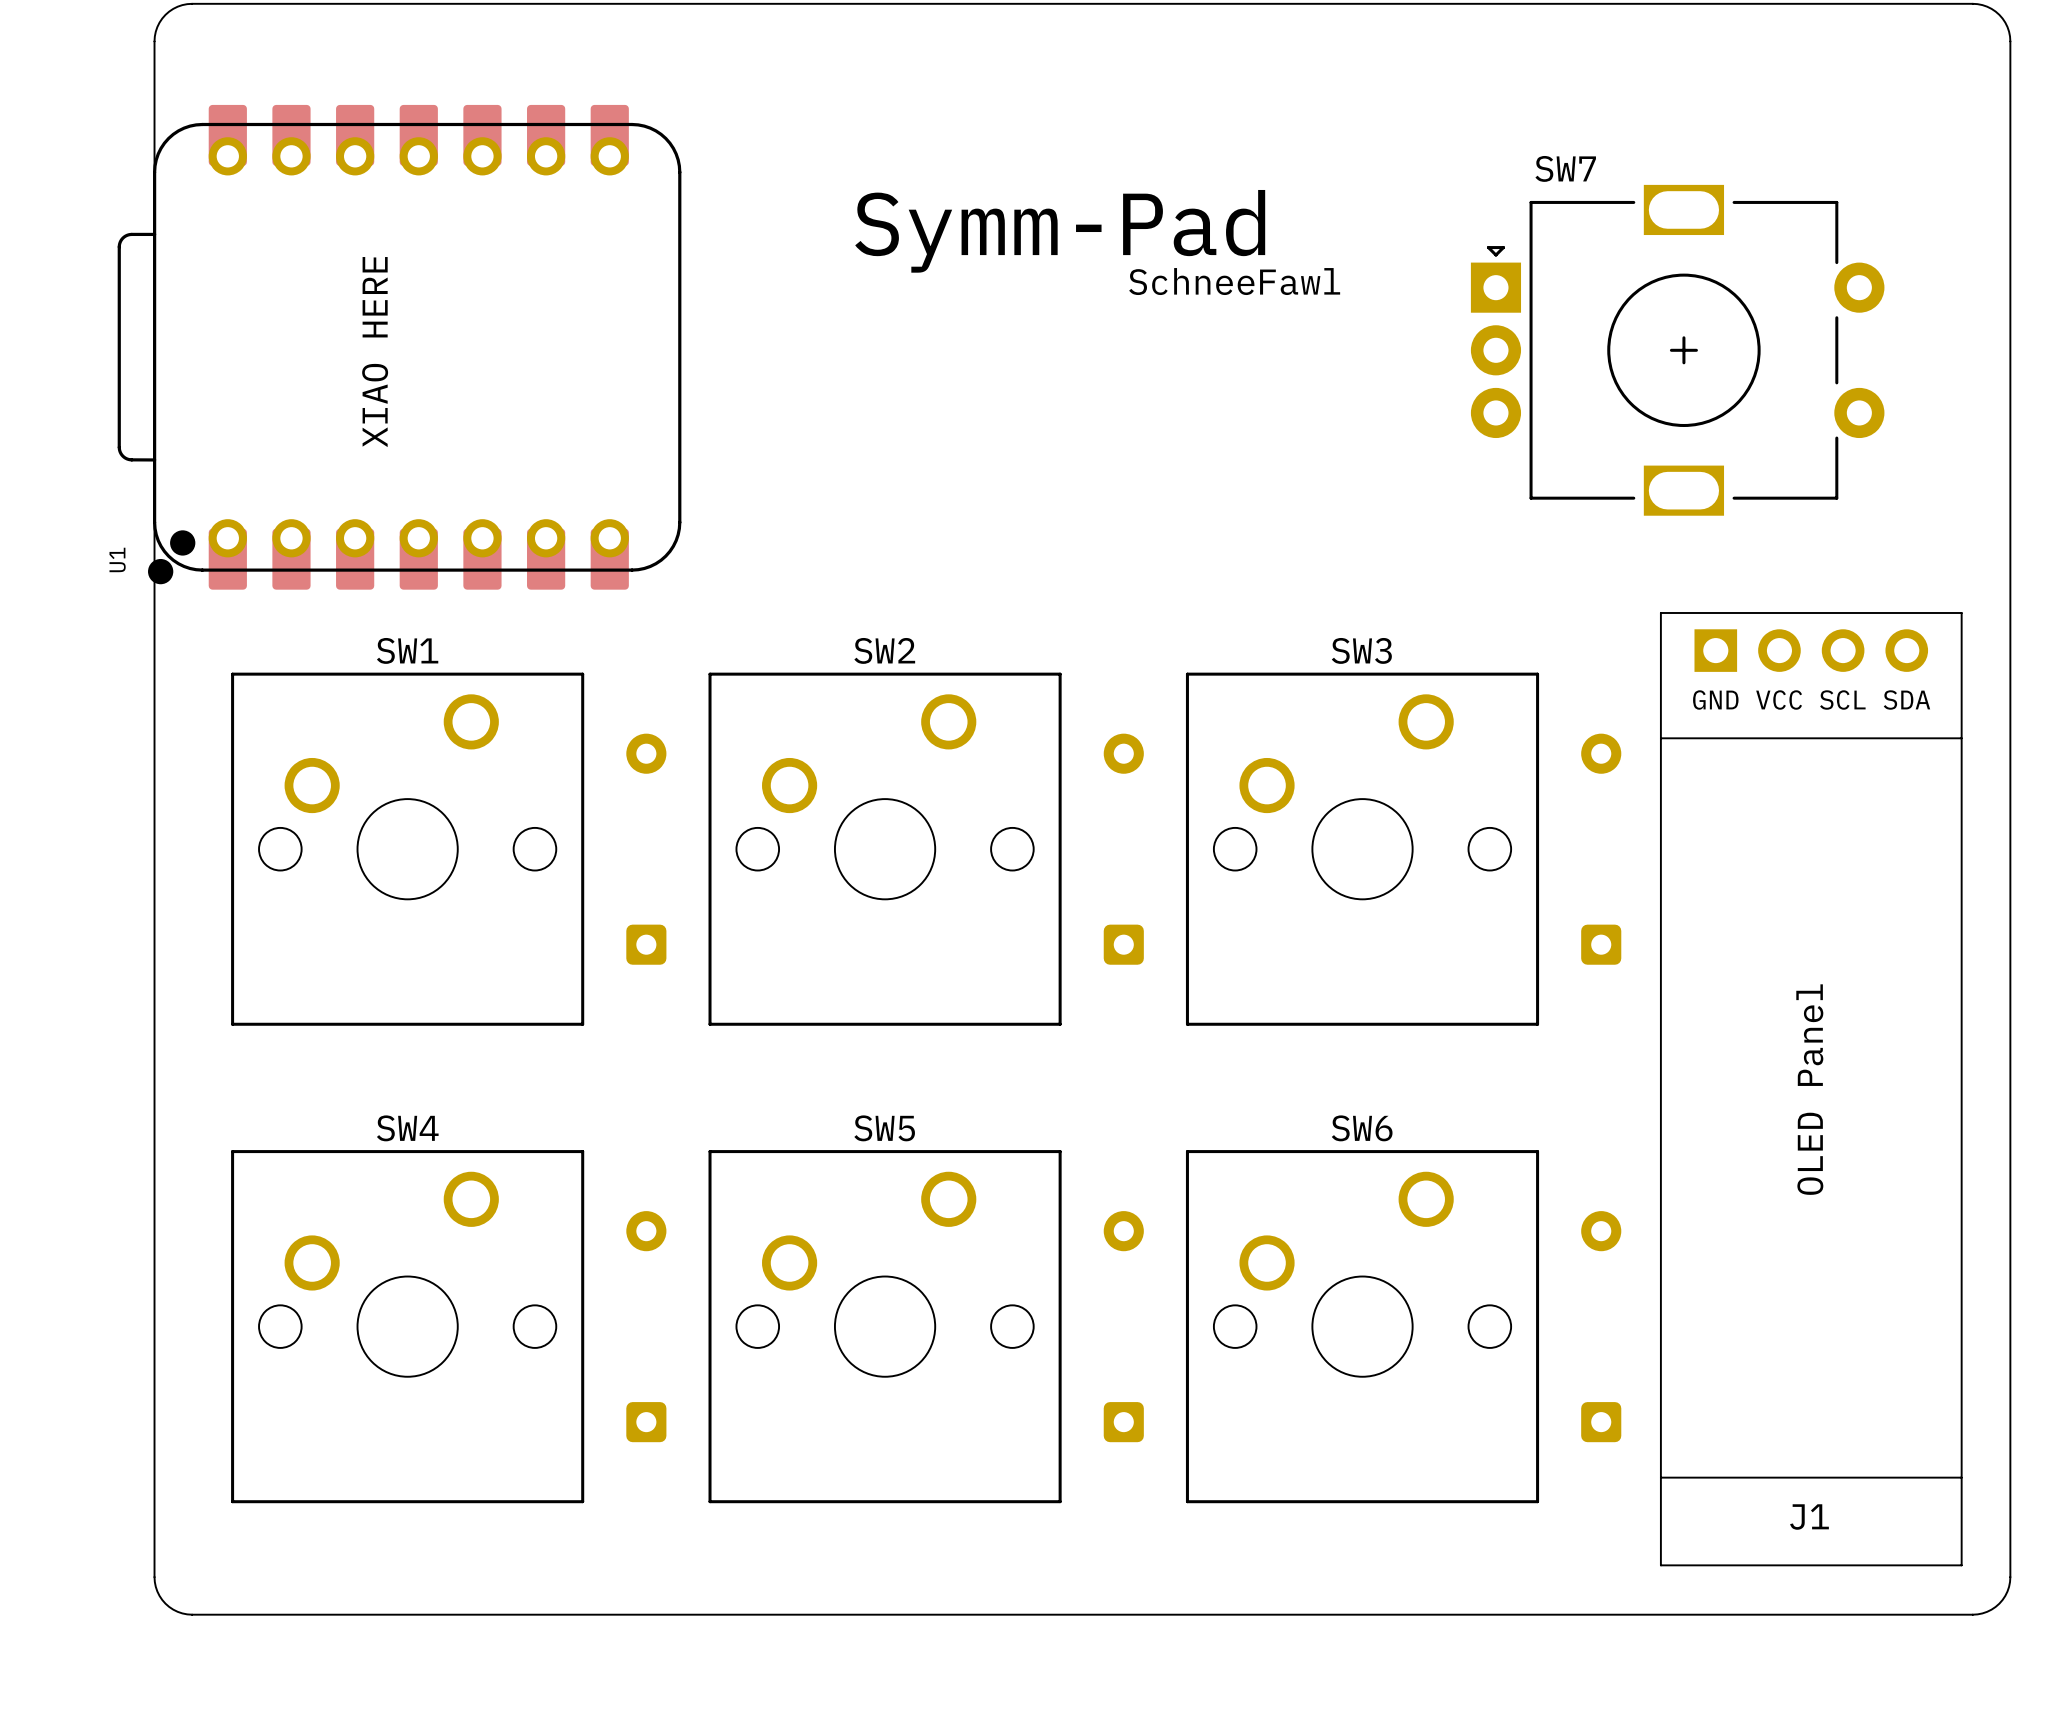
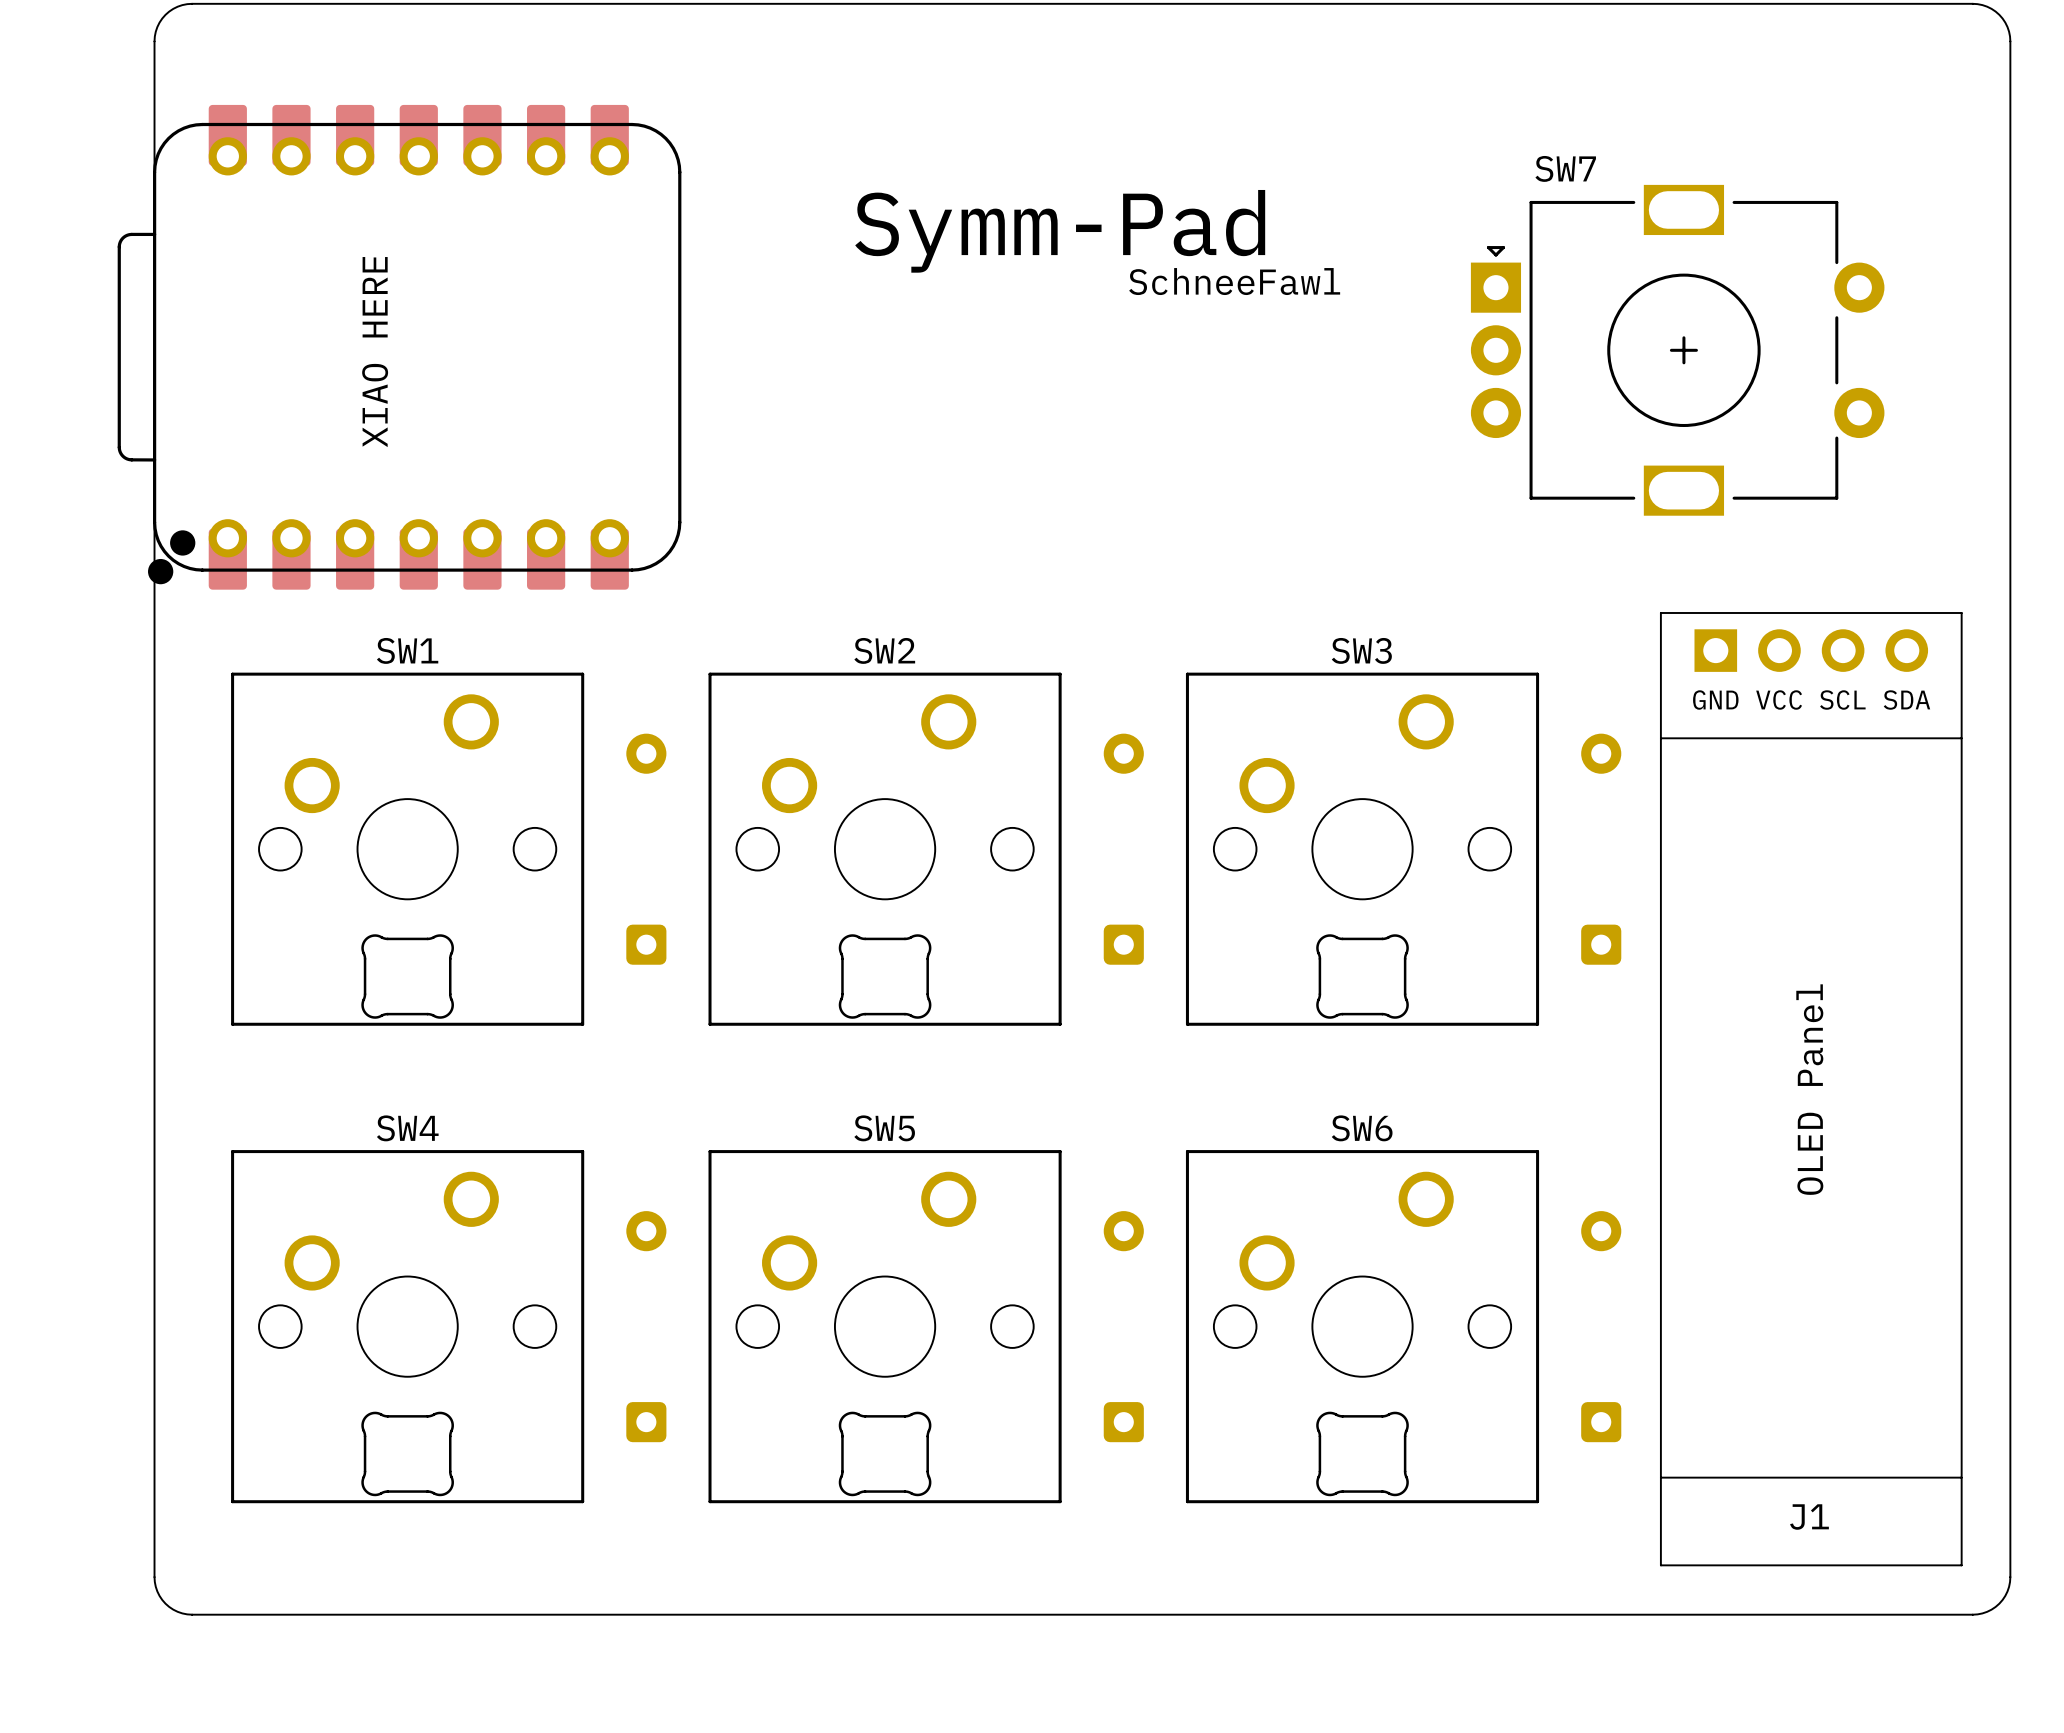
U1 name: U1 (117, 559) -> none
part: none -> (407, 976)
part: none -> (885, 976)
part: none -> (1362, 976)
part: none -> (407, 1453)
part: none -> (885, 1453)
part: none -> (1362, 1453)

